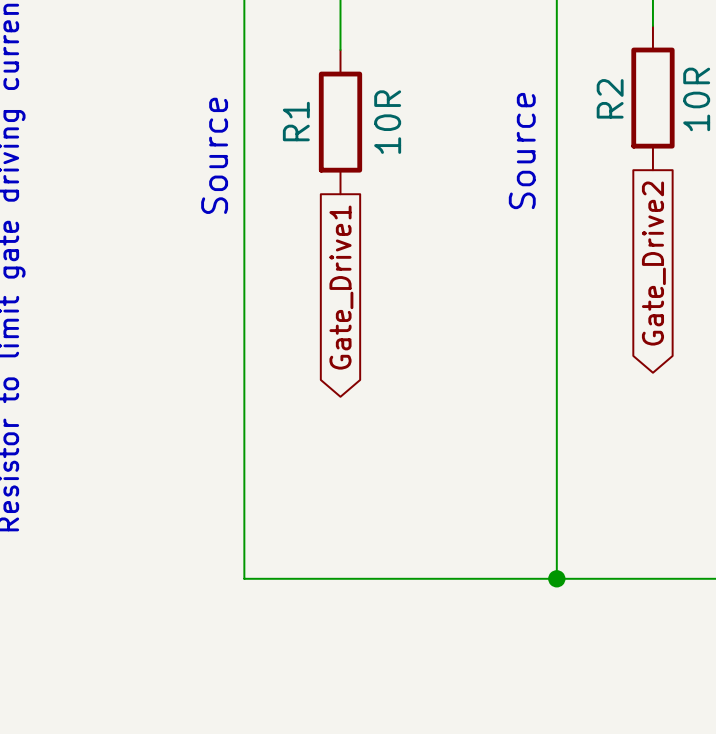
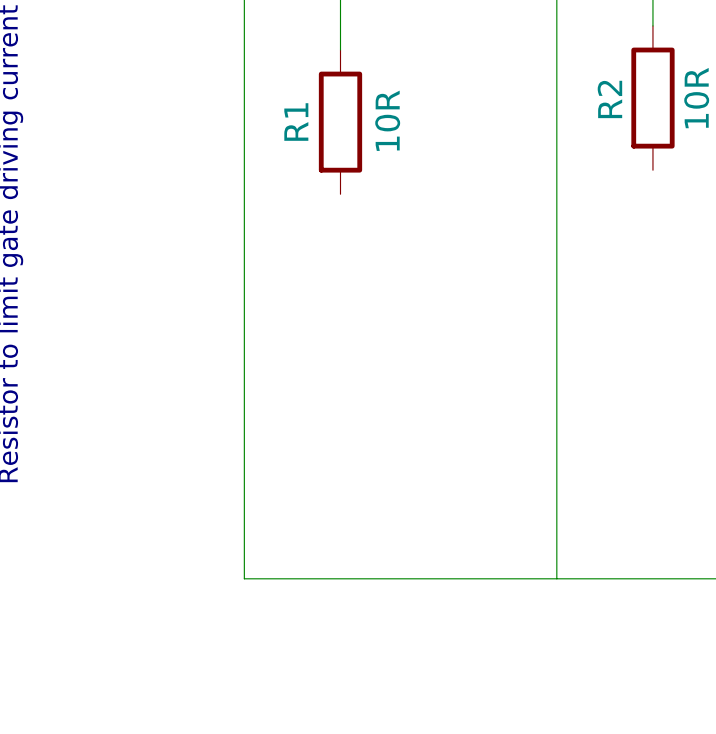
text: Source (522, 151) -> none
text: Source (214, 155) -> none
global label: Gate_Drive2 (653, 263) -> none
global label: Gate_Drive1 (341, 287) -> none
junction: (556, 578) -> none

